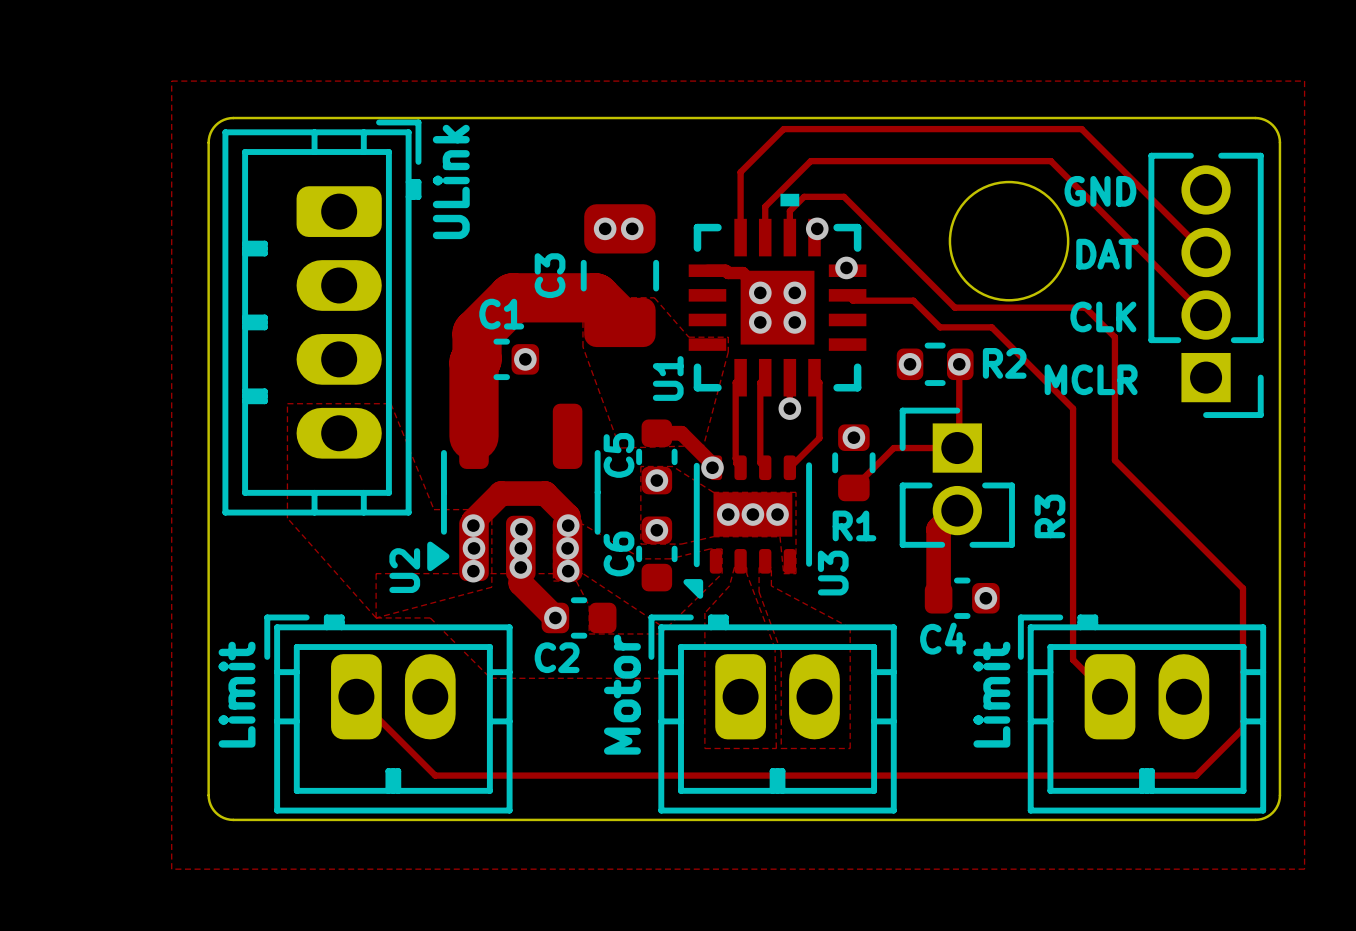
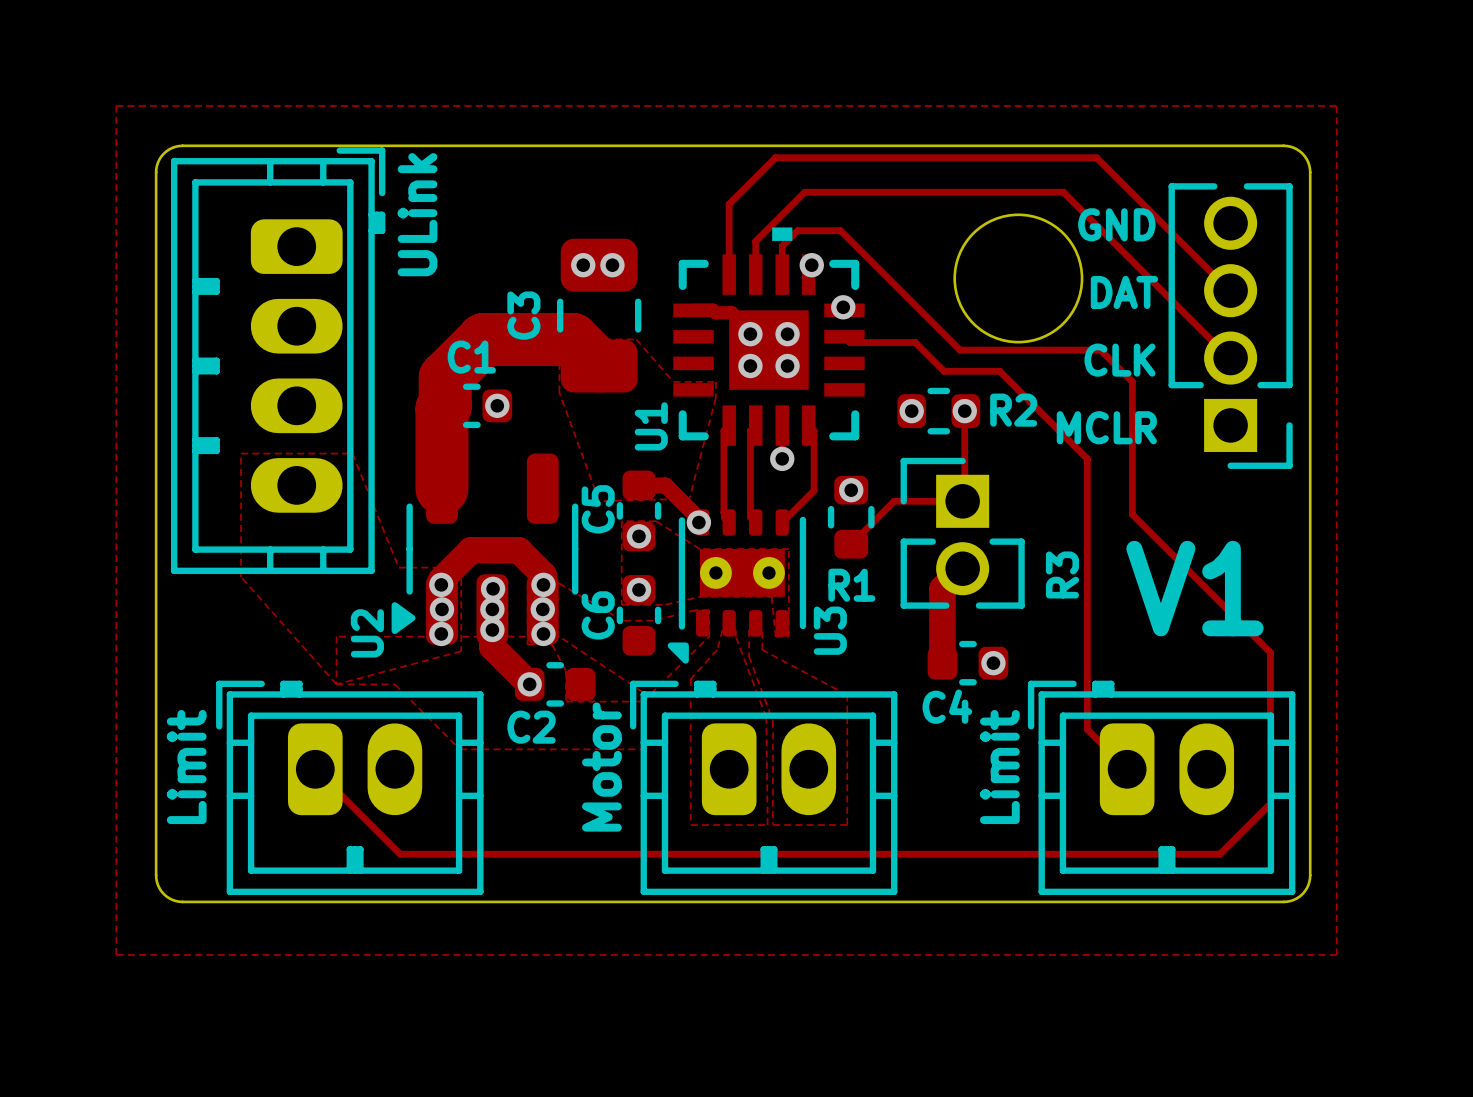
U3 footprint: [683, 455, 813, 599] -> [667, 509, 807, 664]
via: (728, 514) -> none
via: (752, 514) -> none
via: (777, 514) -> none
text: none -> V1 (1194, 588)

